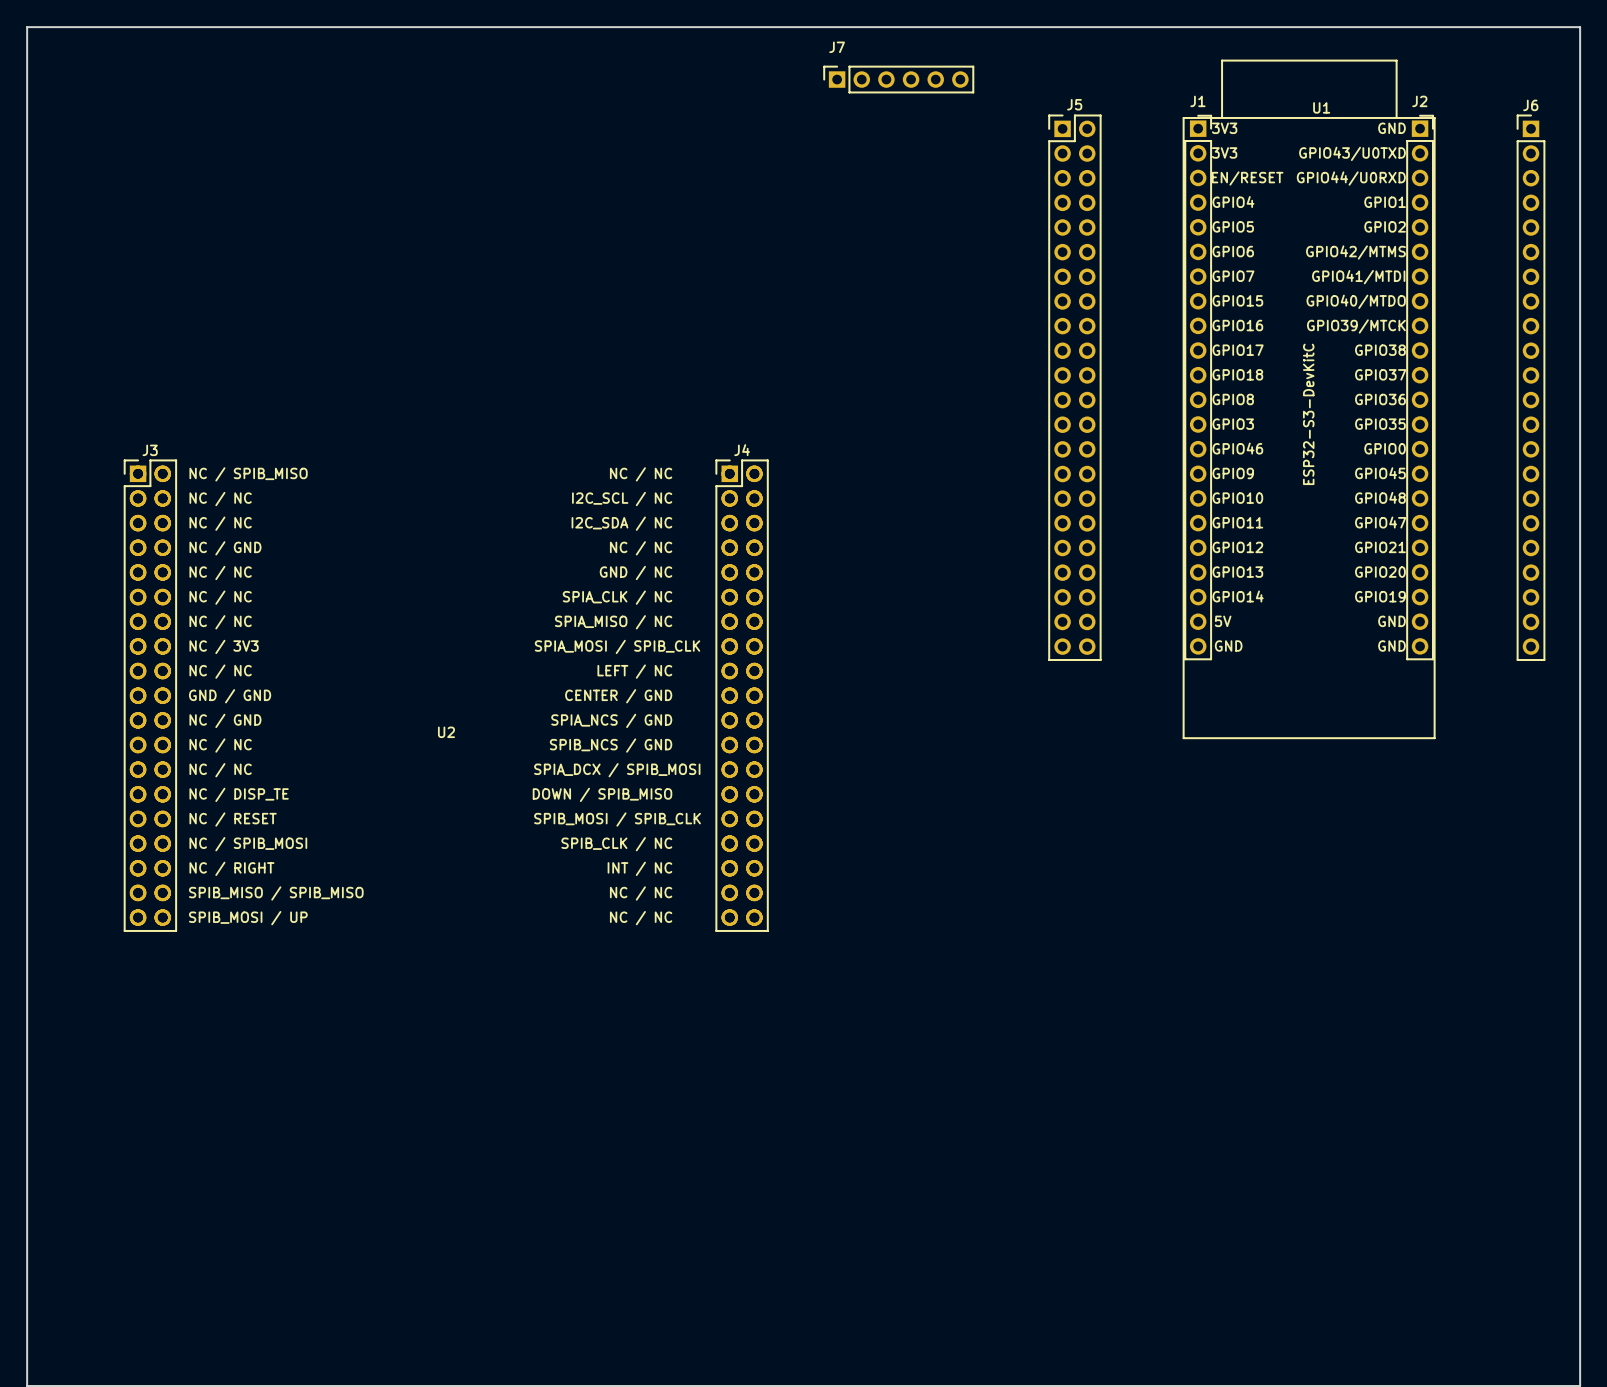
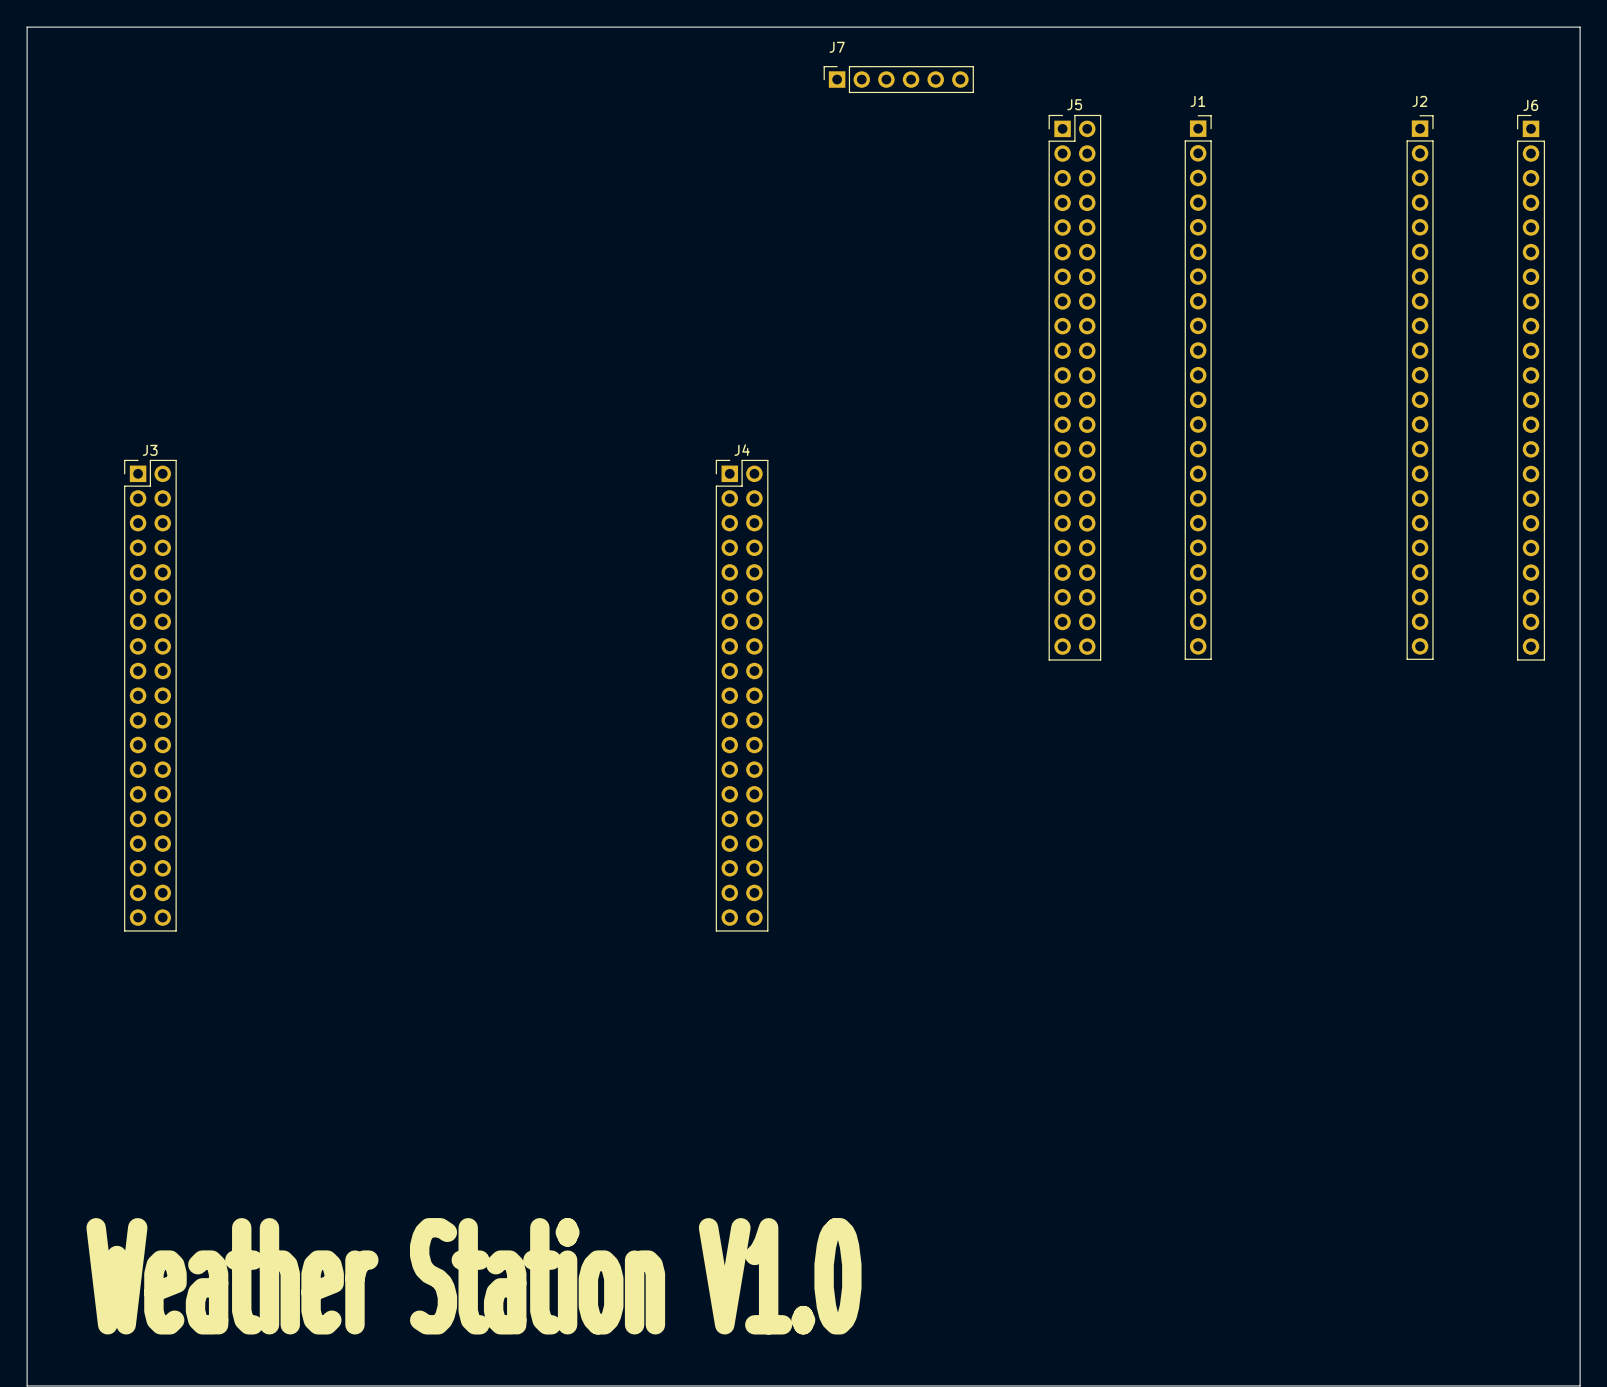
U1: ESP32-S3-DevKitC (1309, 399) -> none
U2: (446, 695) -> none
text: none -> Weather Station V1.0 (473, 1276)

